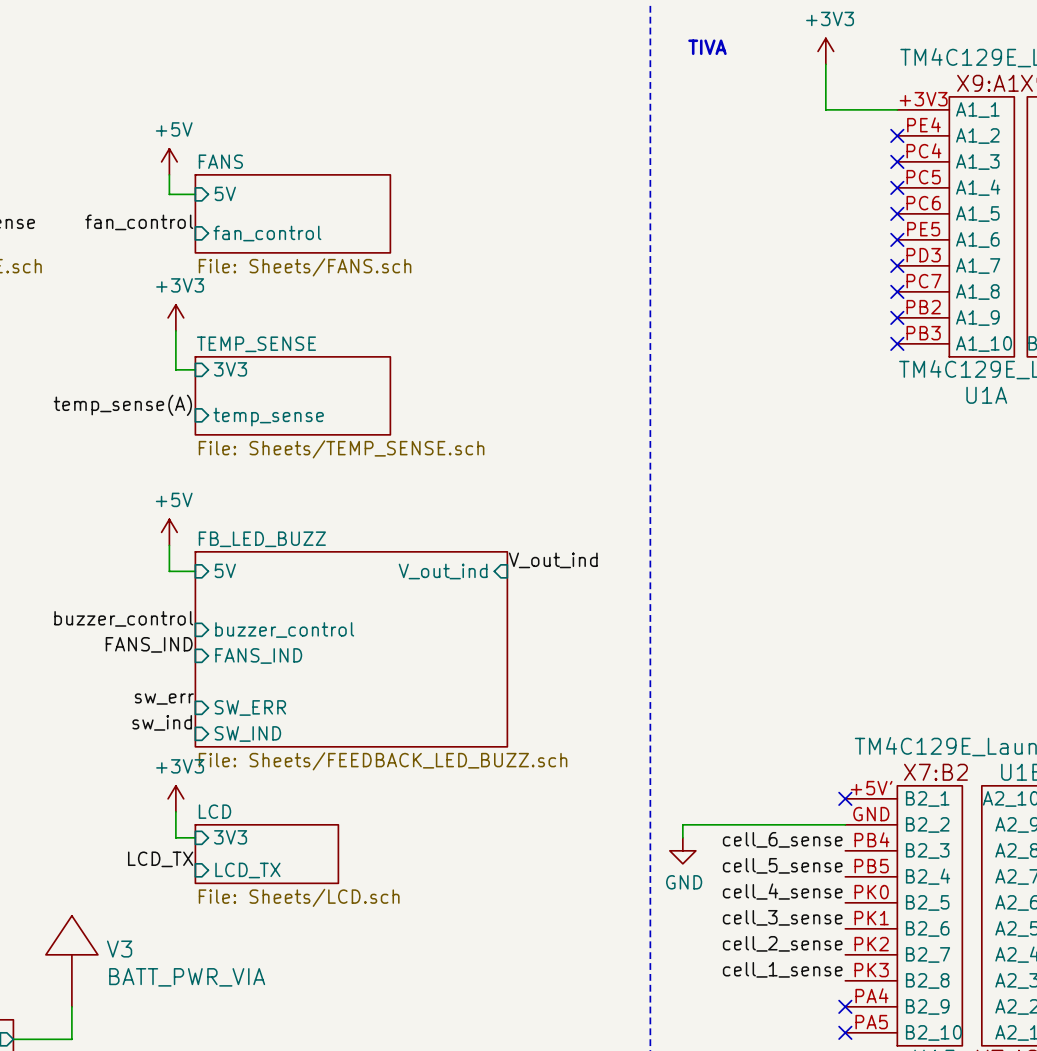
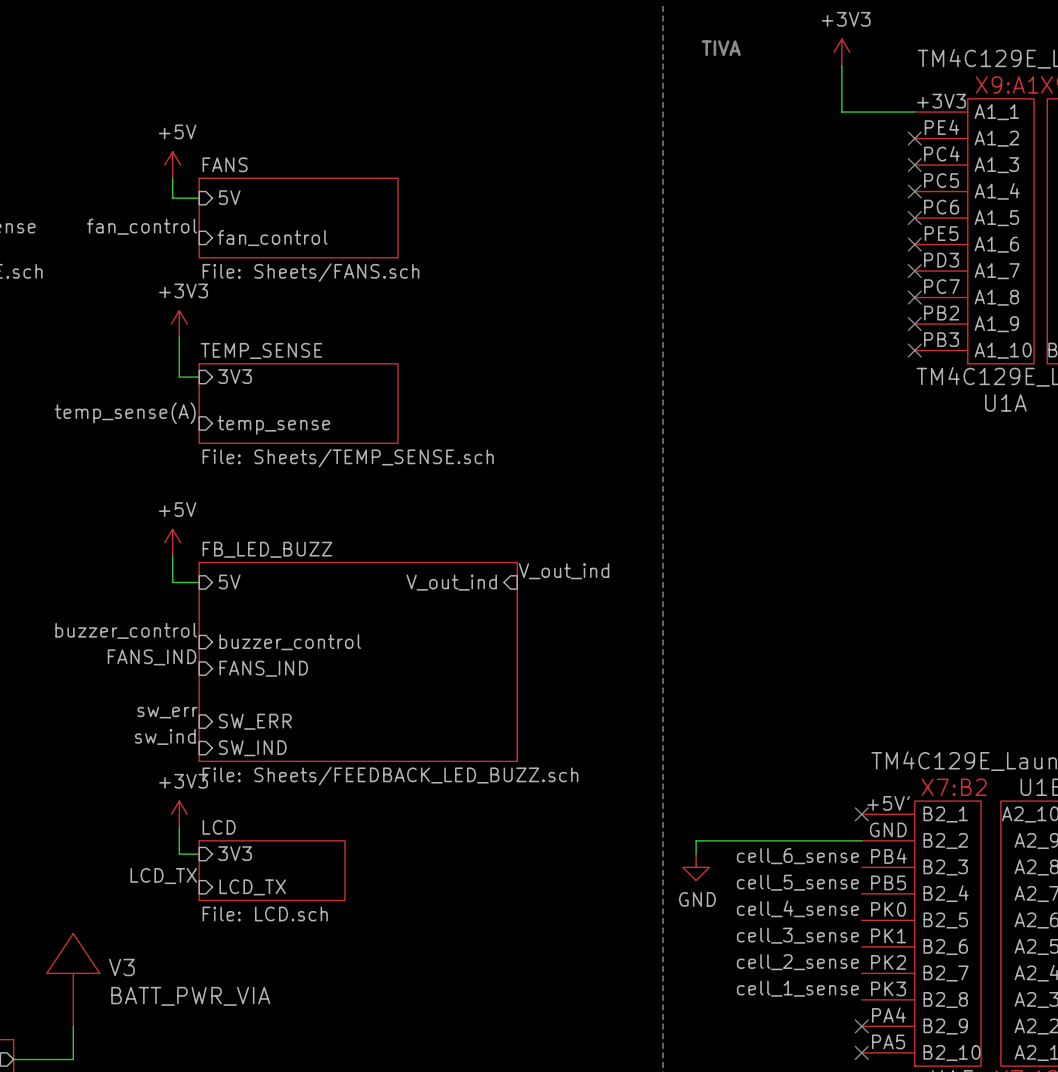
sheet LCD value: File: Sheets/LCD.sch (299, 897) -> File: LCD.sch (265, 914)

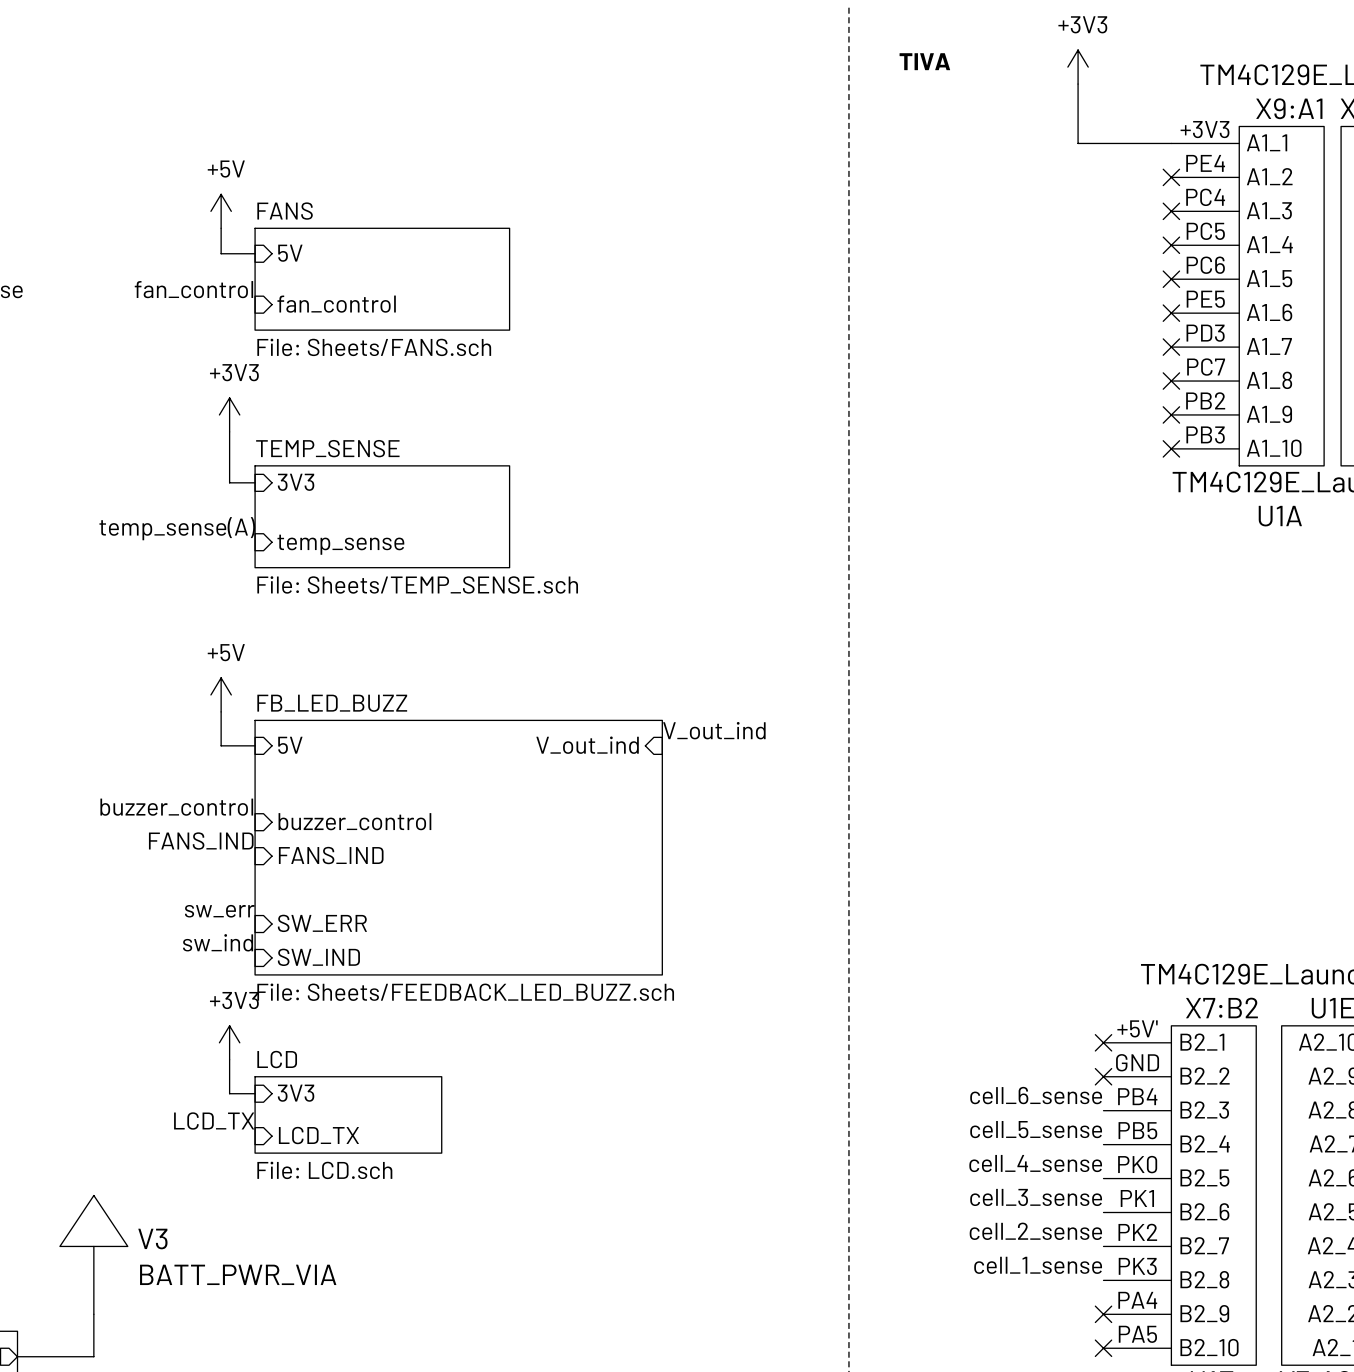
wire: (861, 840) (696, 840) (696, 854) -> none
no-connect mark: none -> (1103, 1076)
power symbol: GND (696, 867) -> none

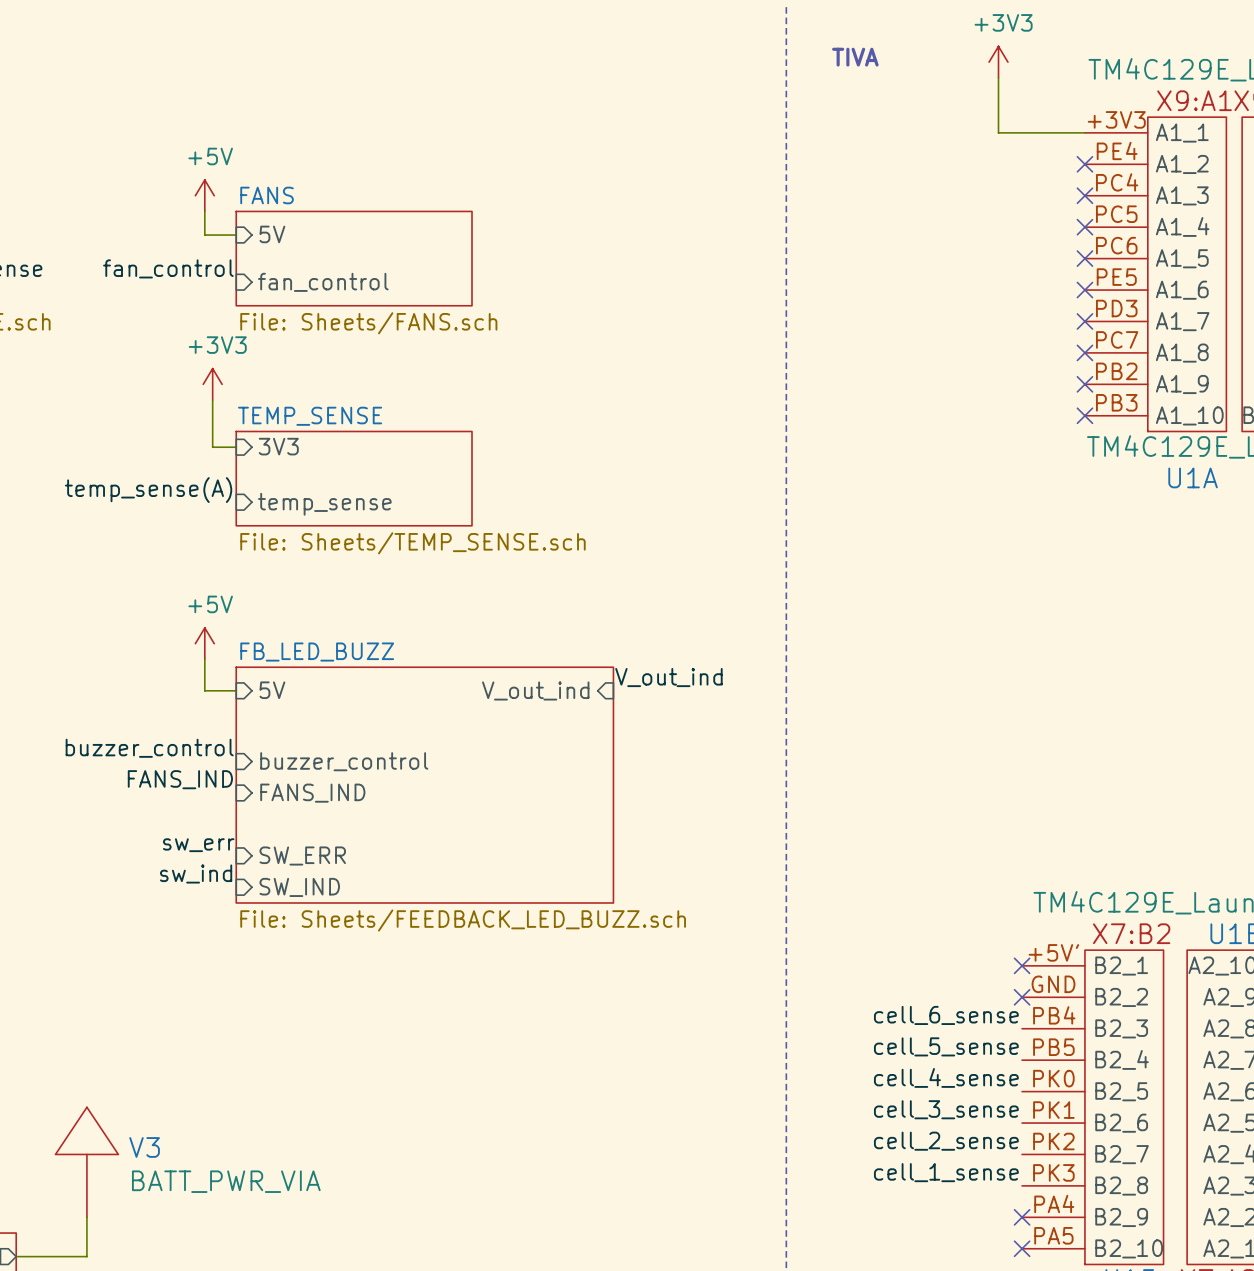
power symbol: +3V3 (229, 1042) -> none
wire: (229, 1059) (229, 1093) (255, 1093) -> none
sheet pin: 3V3 (296, 1093) -> none
sheet LCD: File: LCD.sch (348, 1114) -> none
label: LCD_TX (214, 1121) -> none
sheet pin: LCD_TX (318, 1135) -> none

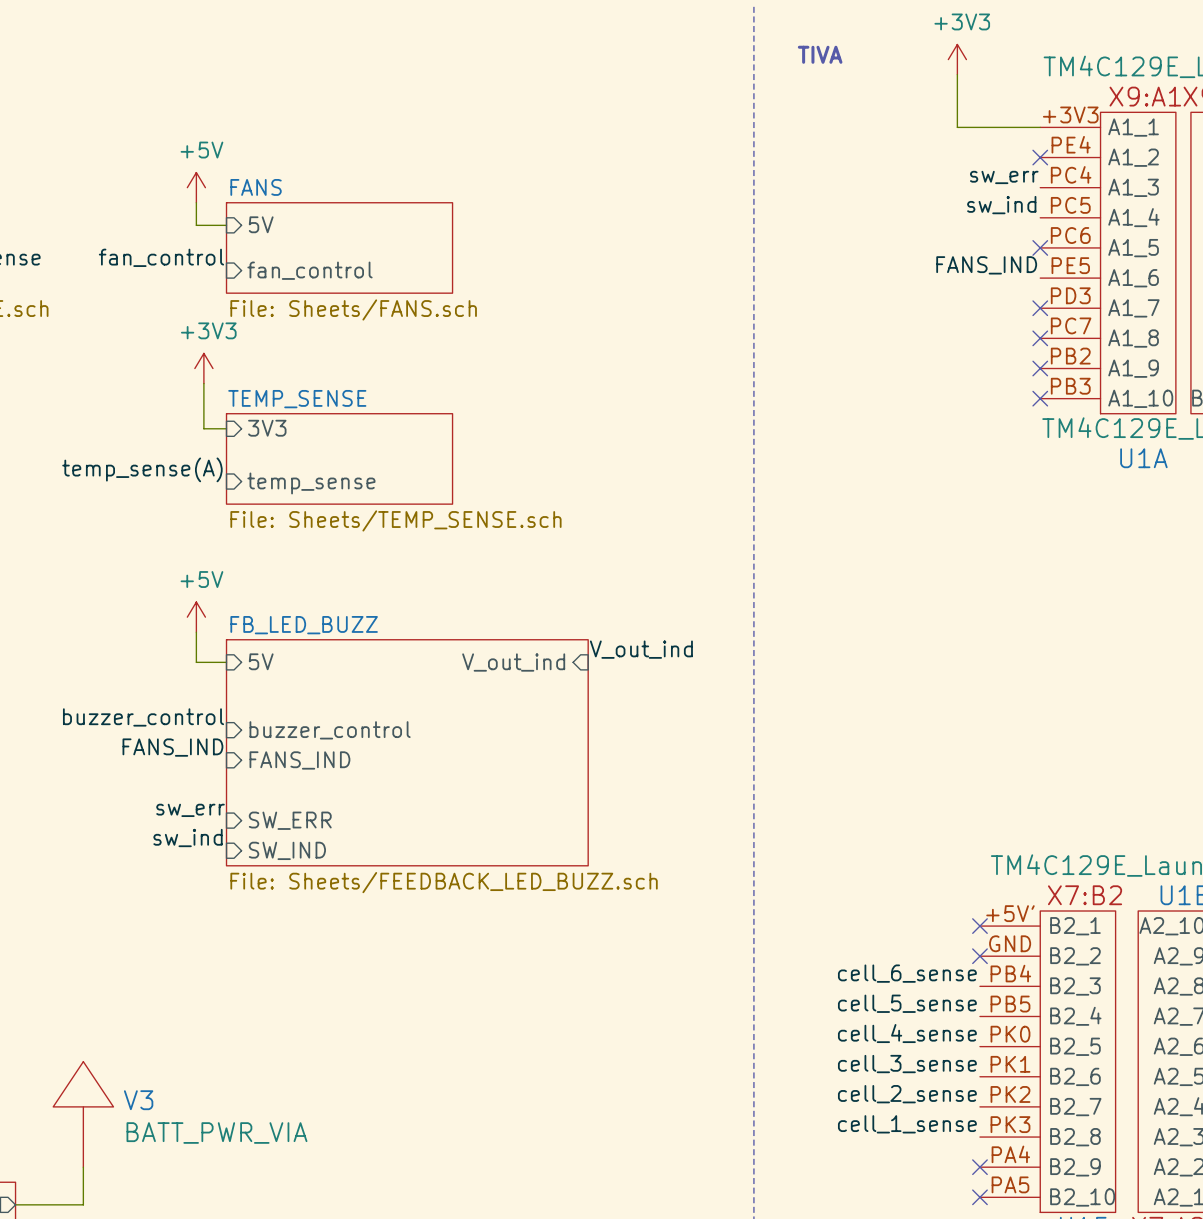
label: none -> sw_err (1004, 177)
no-connect mark: (1084, 195) -> none
label: none -> sw_ind (1001, 205)
no-connect mark: (1084, 227) -> none
label: none -> FANS_IND (986, 265)
no-connect mark: (1084, 290) -> none

